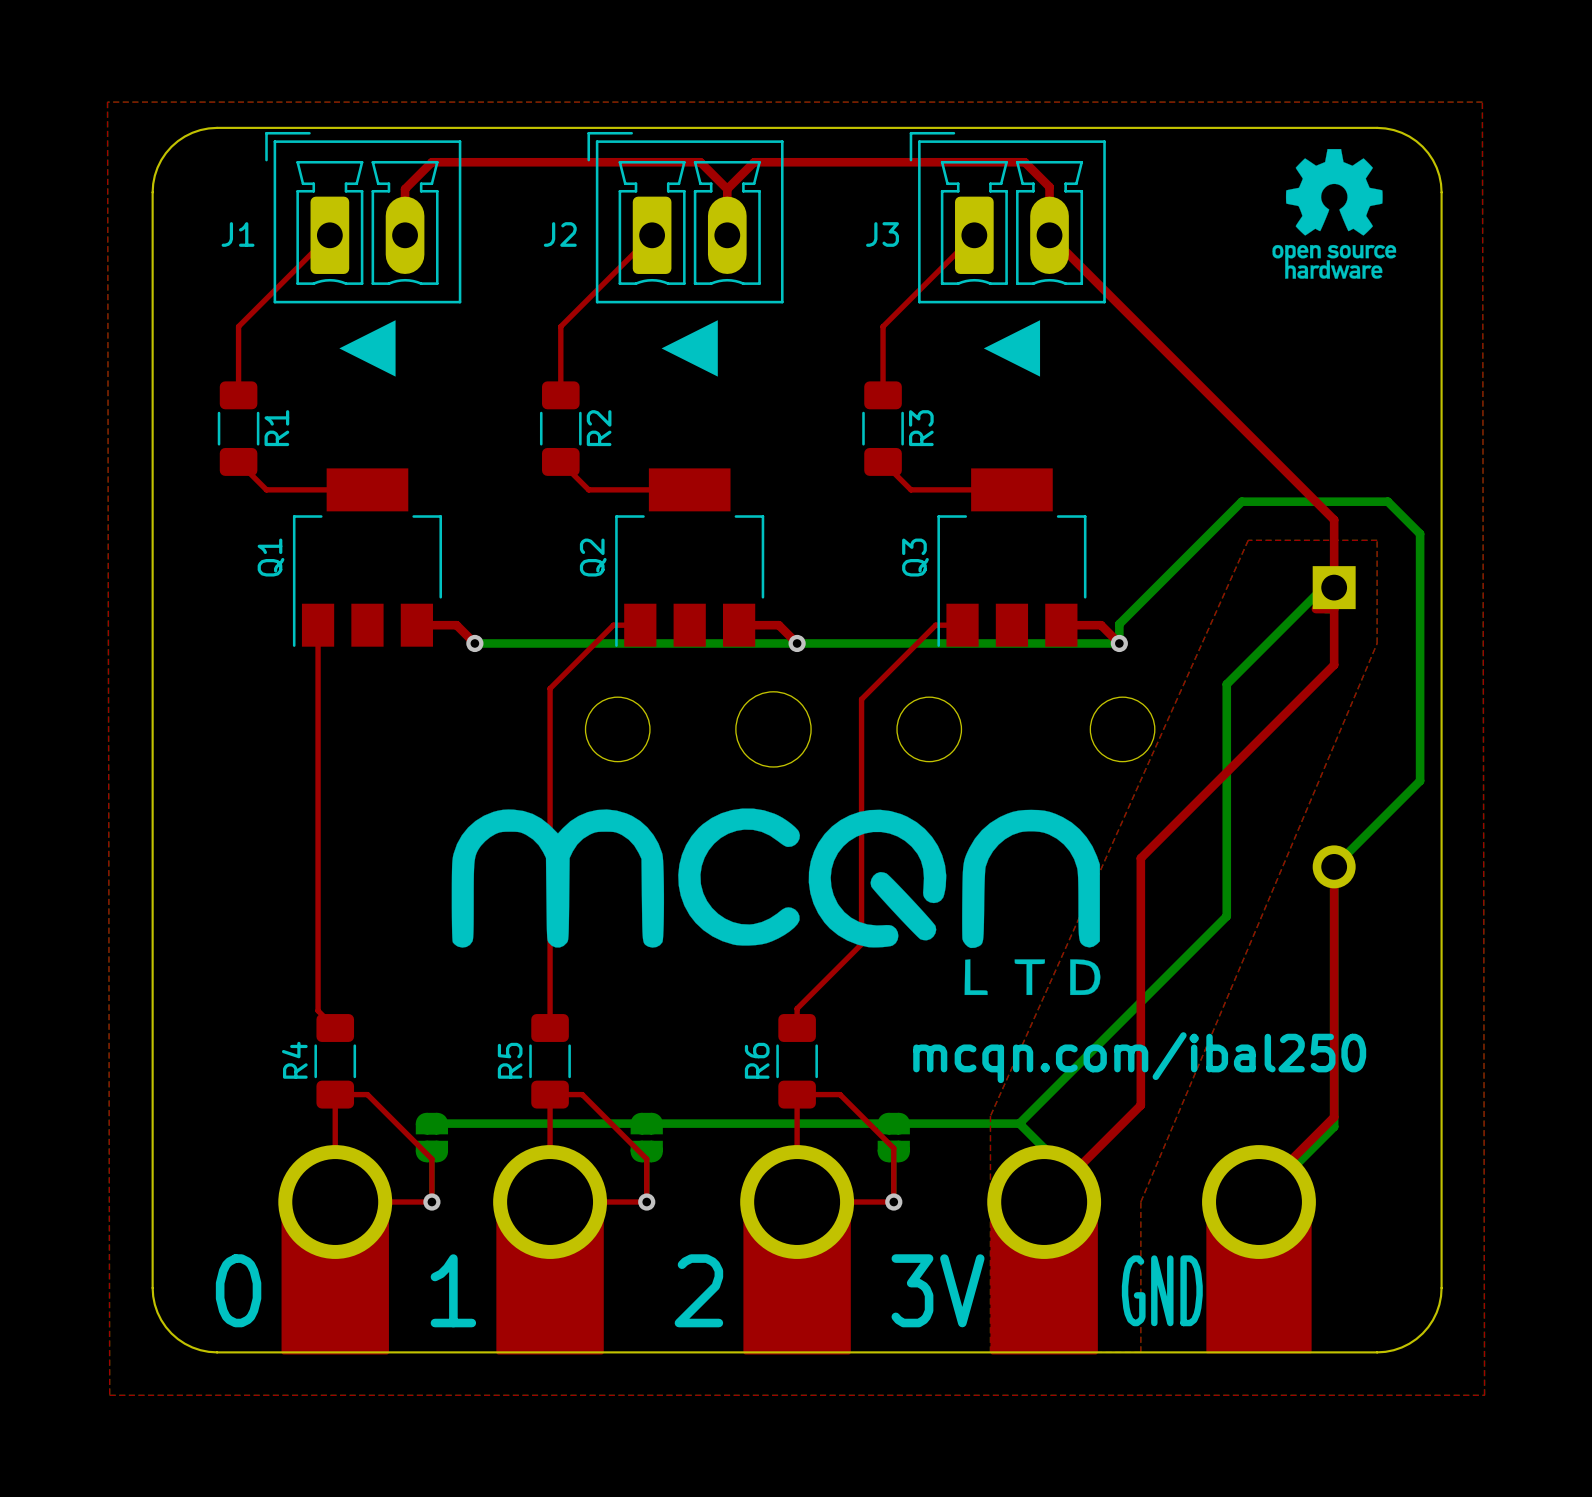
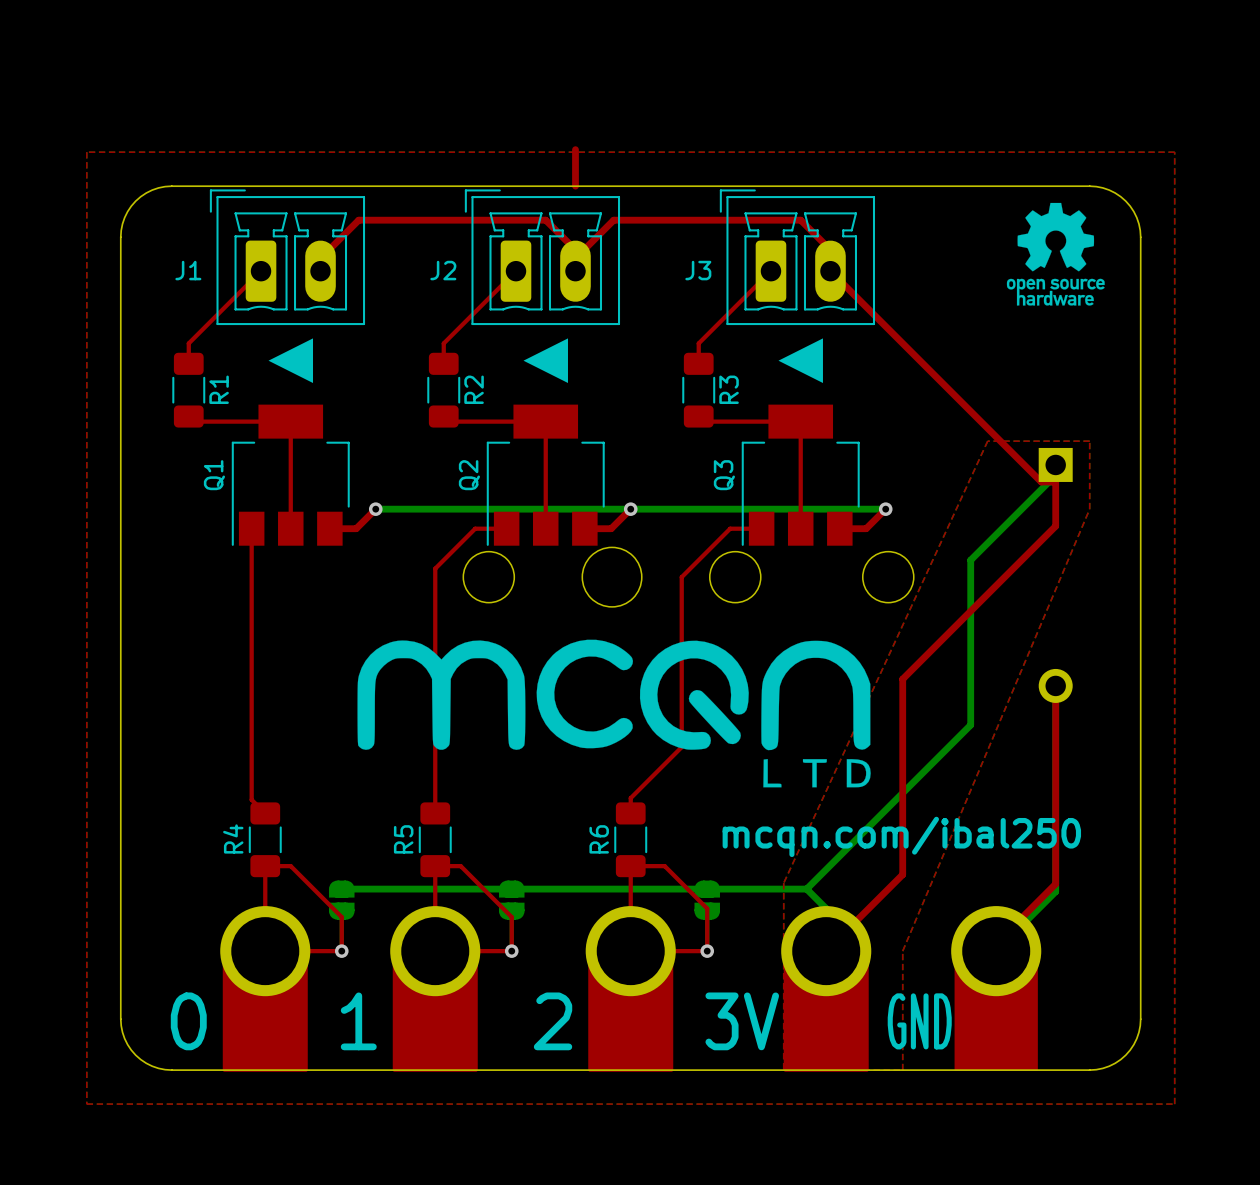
drawing position: (1334, 213) -> (1055, 254)
J1 position: (363, 217) -> (287, 257)
J2 position: (685, 217) -> (542, 257)
J3 position: (1007, 217) -> (797, 257)
top track: (329, 235) (238, 326) (238, 395) -> none
top track: (405, 235) (405, 189) (431, 162) (700, 162) (727, 189) (754, 162) (1024, 162) (1049, 186) (1049, 235) (1334, 519) (1334, 609) -> none
top track: (652, 235) (560, 326) (560, 395) -> none
top track: (974, 235) (883, 326) (883, 395) -> none
board edge: (152, 299) (152, 192) (157, 167) (171, 146) (184, 136) (200, 130) (217, 127) (1385, 128) (1409, 136) (1422, 146) (1432, 160) (1439, 175) (1441, 192) (1441, 299) -> (120, 237) (124, 217) (135, 201) (152, 190) (171, 186) (1089, 186) (1109, 190) (1125, 201) (1136, 217) (1140, 237)
top track: none -> (575, 258) (613, 220) (800, 220) (830, 249) (830, 271) (1041, 481)
top track: none -> (261, 271) (188, 343) (188, 363)
top track: none -> (320, 271) (320, 258) (358, 220) (545, 220) (575, 249) (575, 271)
top track: none -> (516, 271) (443, 343) (443, 363)
top track: none -> (770, 271) (698, 343) (698, 363)
text position: ◀ (367, 348) -> ◀ (290, 360)
text position: ◀ (689, 348) -> ◀ (545, 360)
text position: ◀ (1011, 348) -> ◀ (800, 360)
R1 position: (238, 428) -> (188, 390)
R2 position: (560, 428) -> (443, 390)
R3 position: (883, 428) -> (698, 390)
top track: (238, 461) (266, 489) (367, 489) -> none
top track: (560, 461) (588, 489) (689, 489) -> none
top track: (883, 461) (910, 489) (1011, 489) -> none
top track: none -> (188, 416) (193, 421) (290, 421) (290, 528)
top track: none -> (443, 416) (448, 421) (545, 421) (545, 528)
top track: none -> (698, 416) (703, 421) (800, 421) (800, 528)
Q1 position: (367, 557) -> (290, 475)
Q2 position: (689, 557) -> (545, 475)
Q3 position: (1011, 557) -> (800, 475)
top zone outline: (1377, 557) (1377, 540) (1248, 540) (990, 1116) -> (1089, 441) (987, 441) (783, 883)
bottom track: (1334, 587) (1323, 587) (1226, 684) (1226, 707) -> (1048, 481) (970, 560)
top track: (318, 625) (318, 668) -> none
top track: (416, 625) (456, 625) (474, 643) -> (329, 528) (356, 528) (375, 509)
top track: (640, 625) (613, 625) (550, 688) (550, 718) -> (506, 528) (475, 528) (435, 568)
top track: (739, 625) (778, 625) (797, 643) -> (584, 528) (611, 528) (630, 509)
top track: (962, 625) (935, 625) (861, 699) (861, 729) -> (761, 528) (730, 528) (681, 577)
top track: (1061, 625) (1101, 625) (1119, 643) -> (839, 528) (866, 528) (885, 509)
bottom track: (1119, 643) (1119, 624) (1241, 501) (1387, 501) (1420, 533) (1420, 780) (1334, 866) (1334, 888) -> none
top zone outline: (109, 1395) (107, 102) (1482, 102) (1484, 1395) -> (86, 1104) (86, 152) (1174, 152) (1174, 1104)

